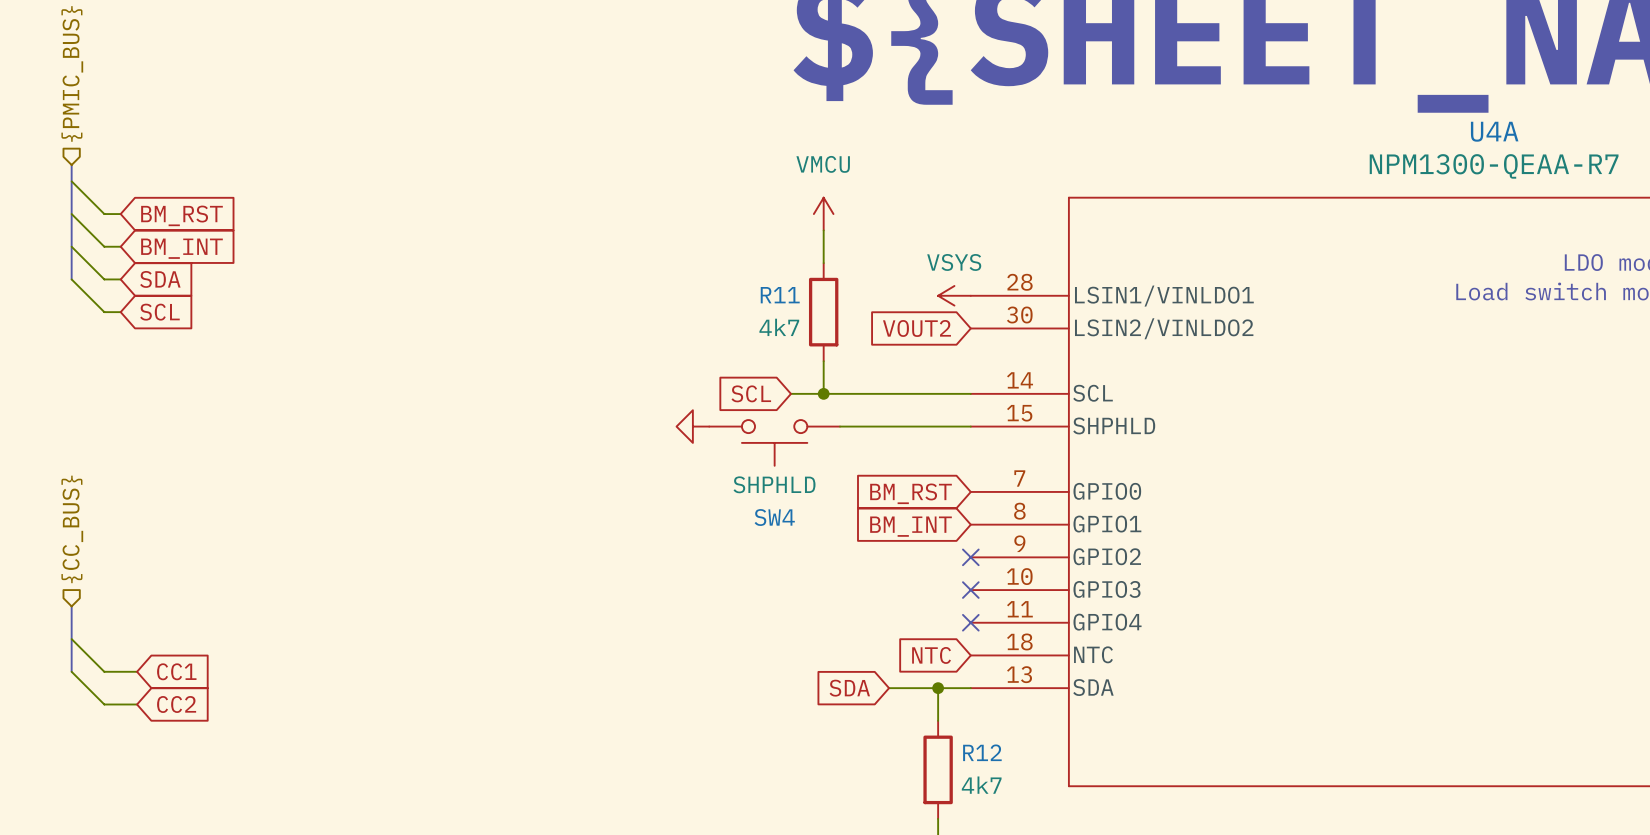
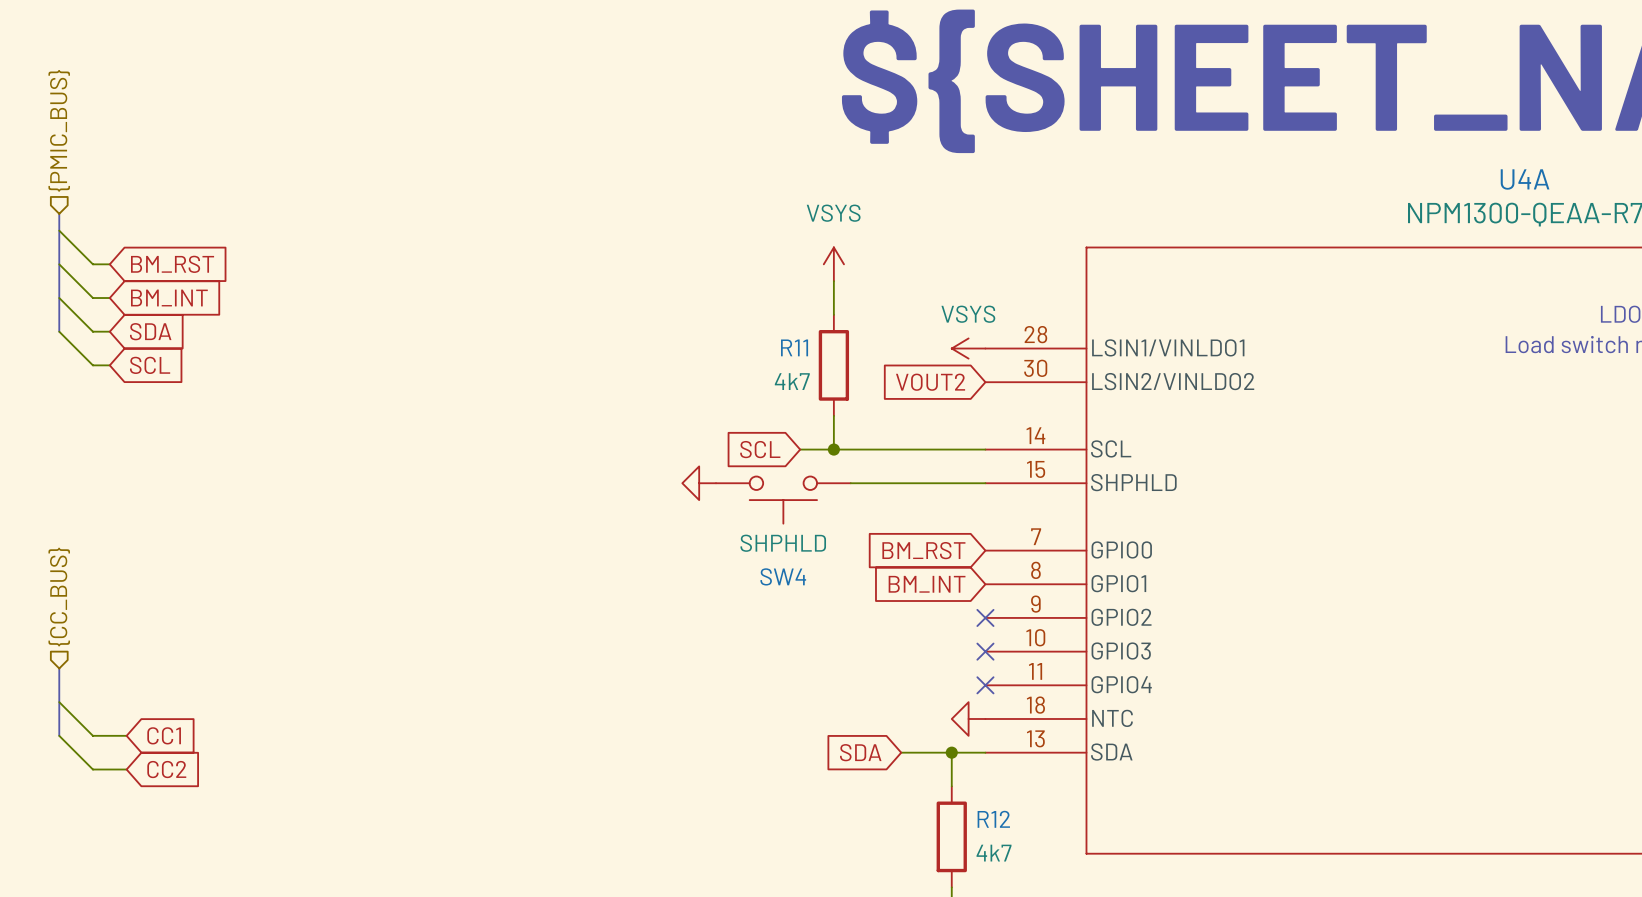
power symbol: VMCU (823, 214) -> VSYS (833, 264)
global label: NTC (931, 655) -> none
power symbol: none -> (968, 718)

